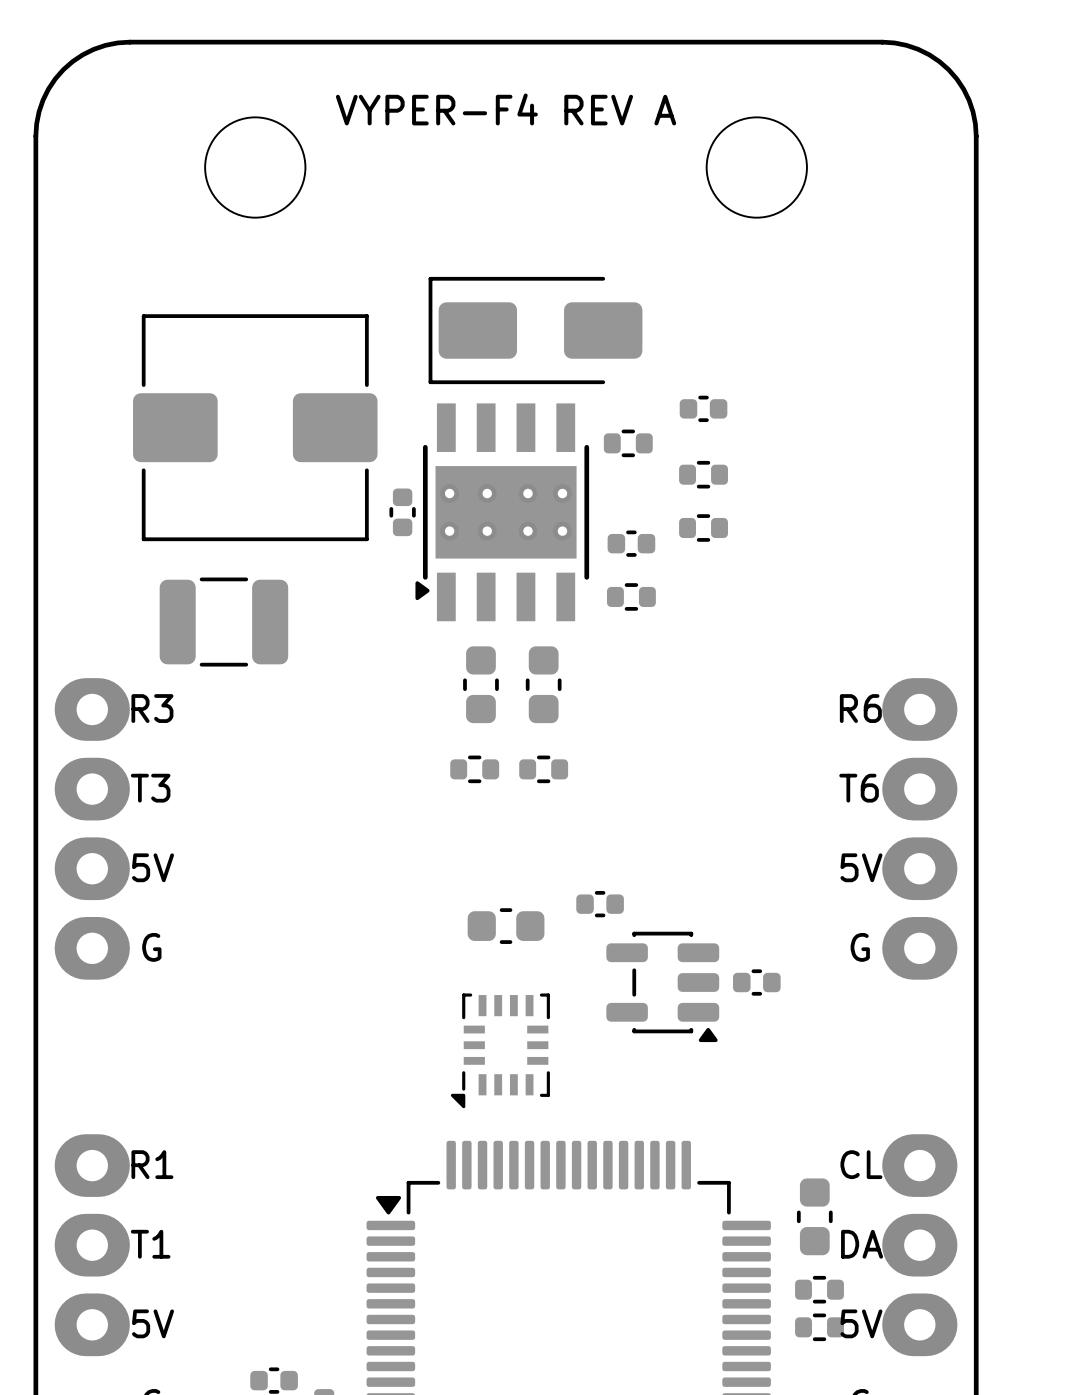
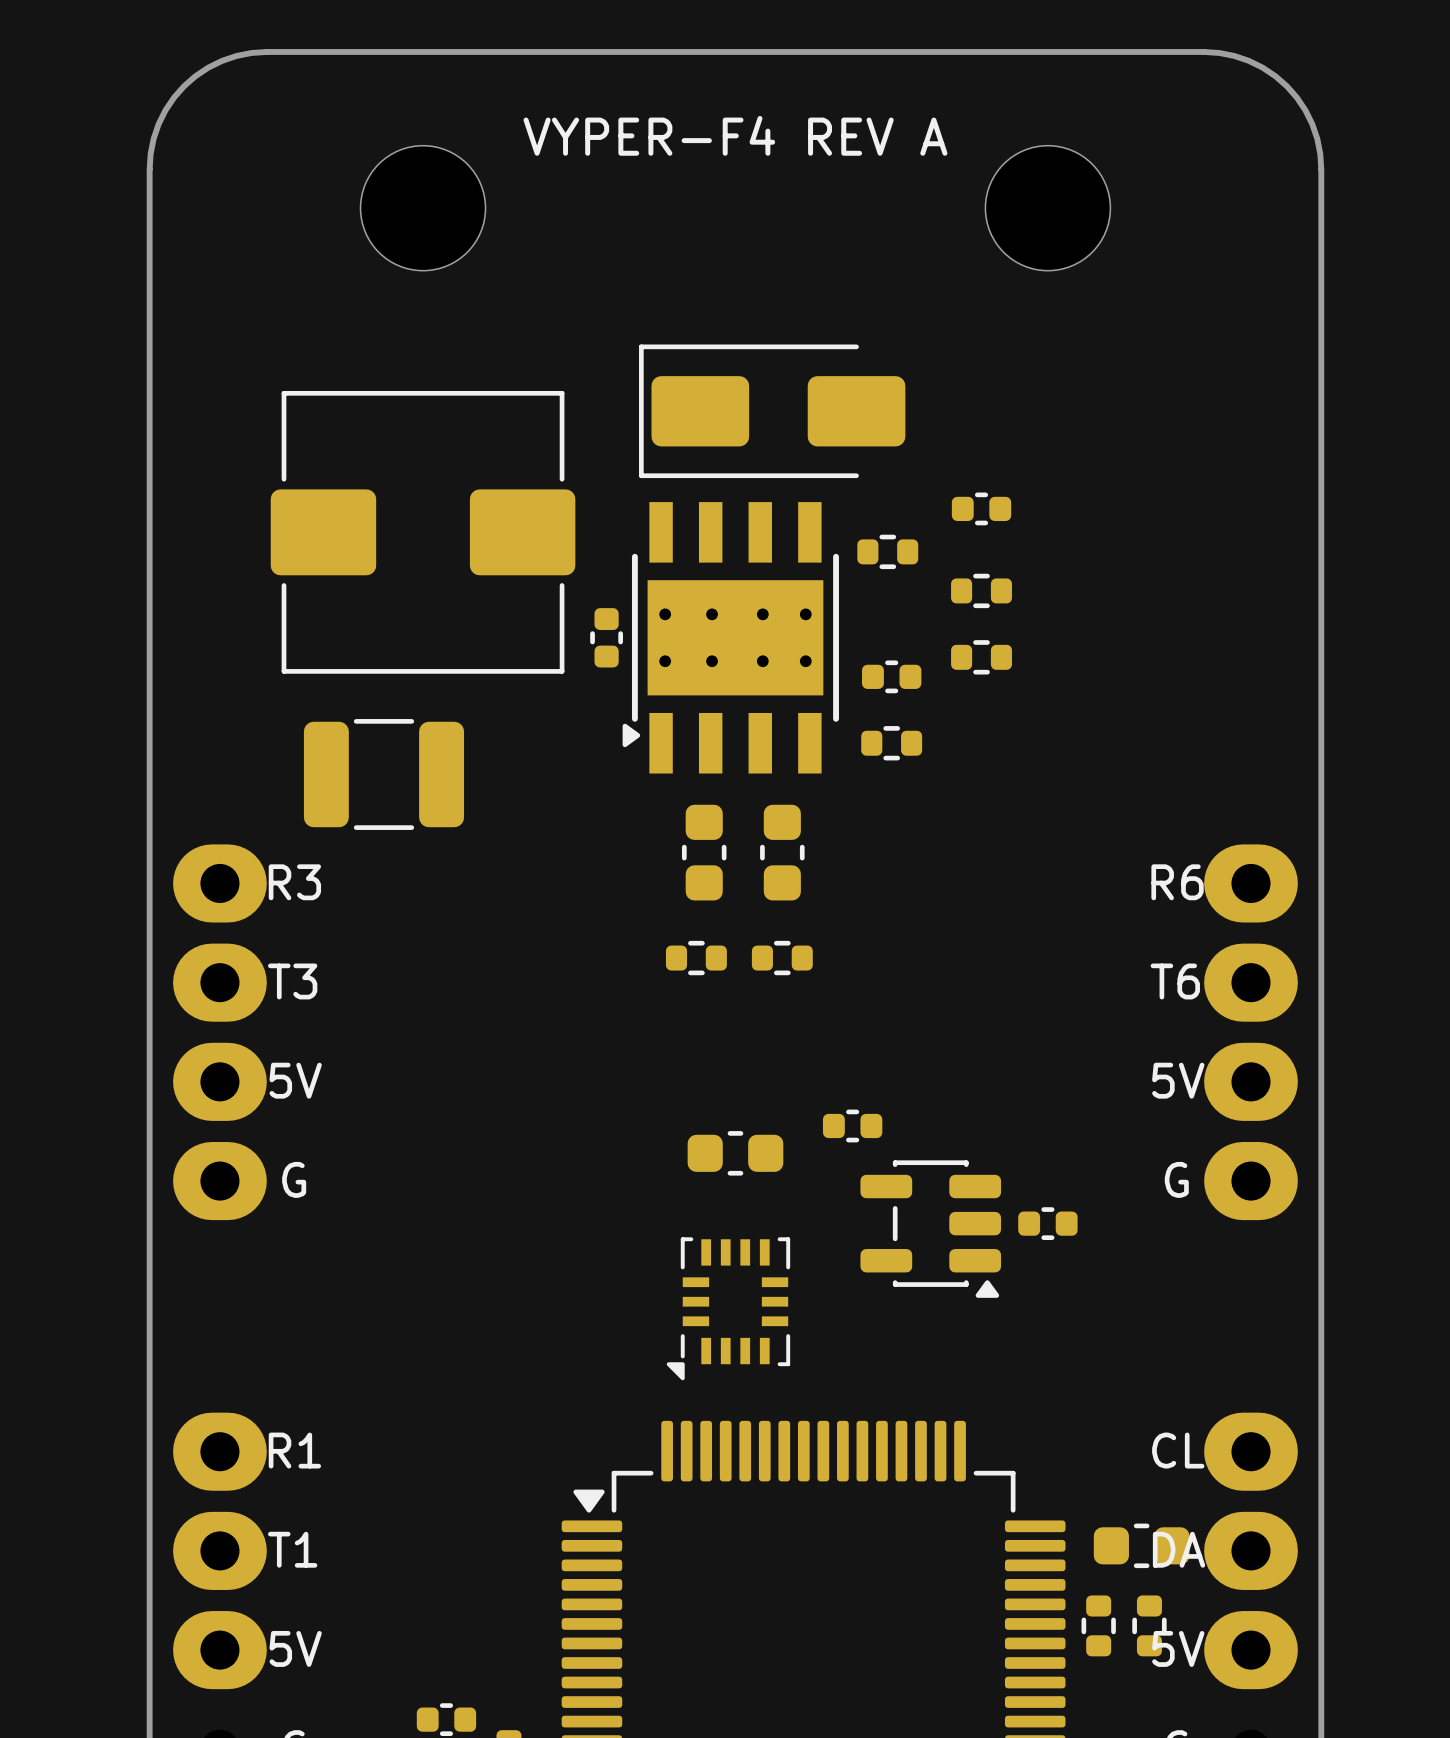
part rotation: 0° (814, 1216) -> 90° clockwise (1141, 1545)
part: (819, 1289) -> none
part: none -> (1098, 1625)
part: none -> (1149, 1625)
part: (819, 1327) -> none

